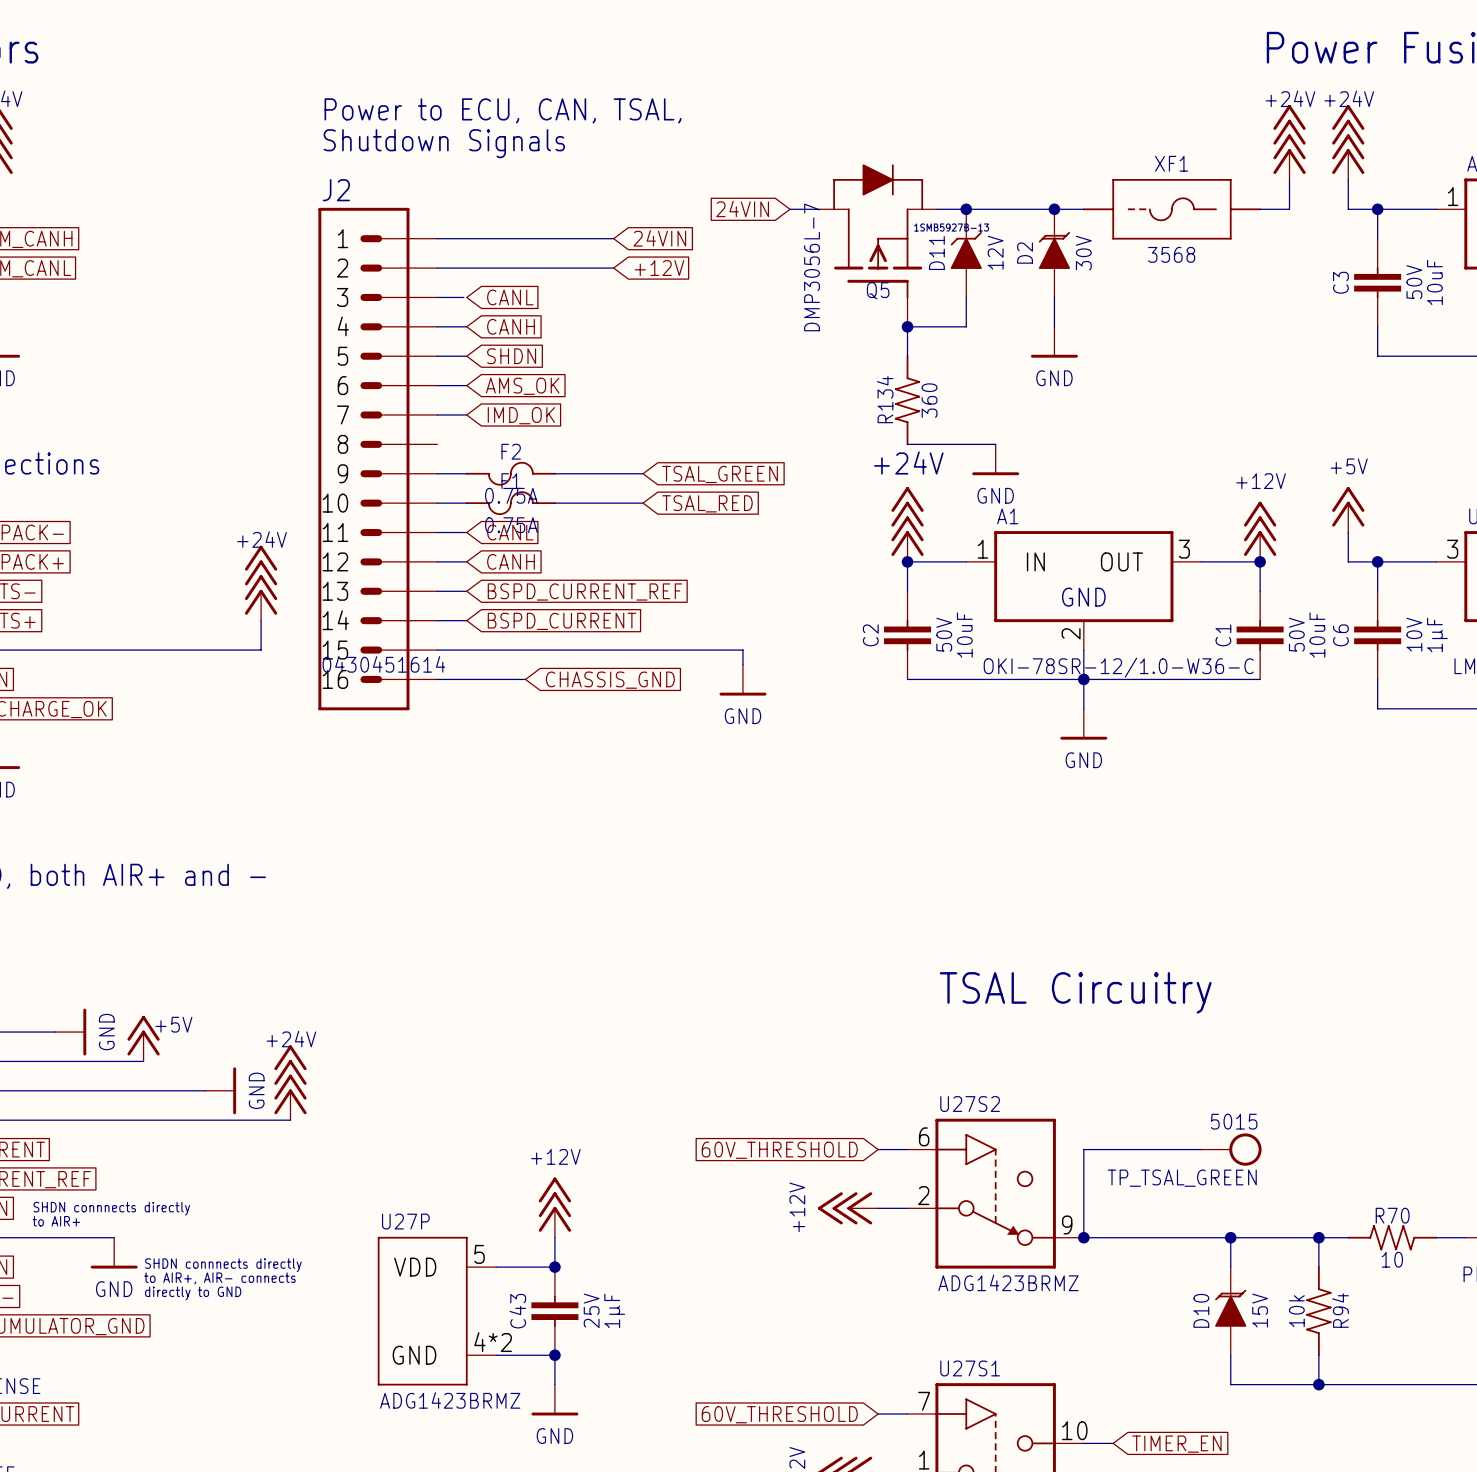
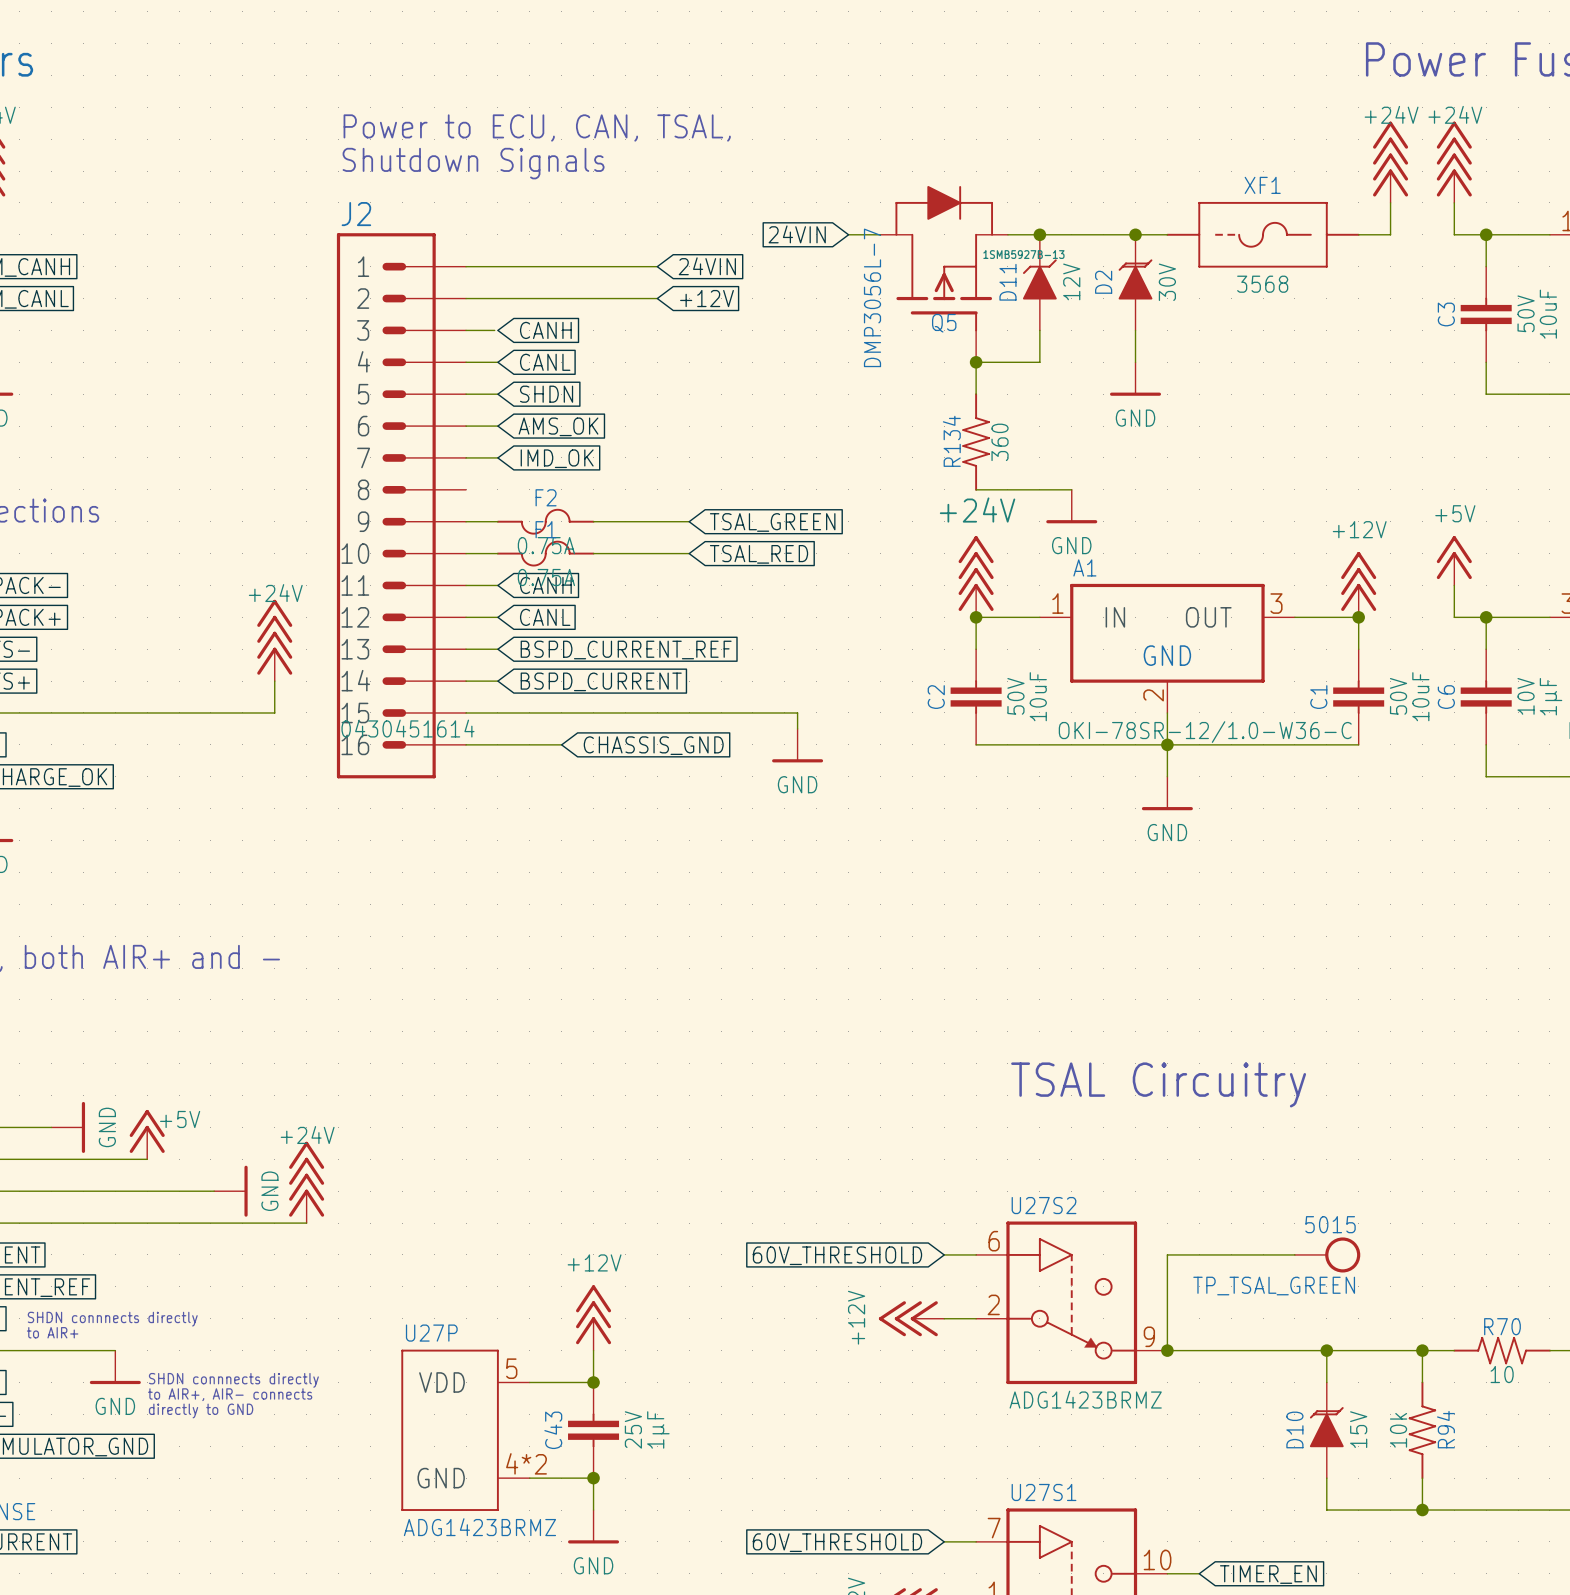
global label: CANL (510, 297) -> CANH (545, 330)
global label: CANH (510, 326) -> CANL (545, 362)
global label: CANL (510, 532) -> CANH (545, 585)
global label: CANH (510, 561) -> CANL (545, 617)

